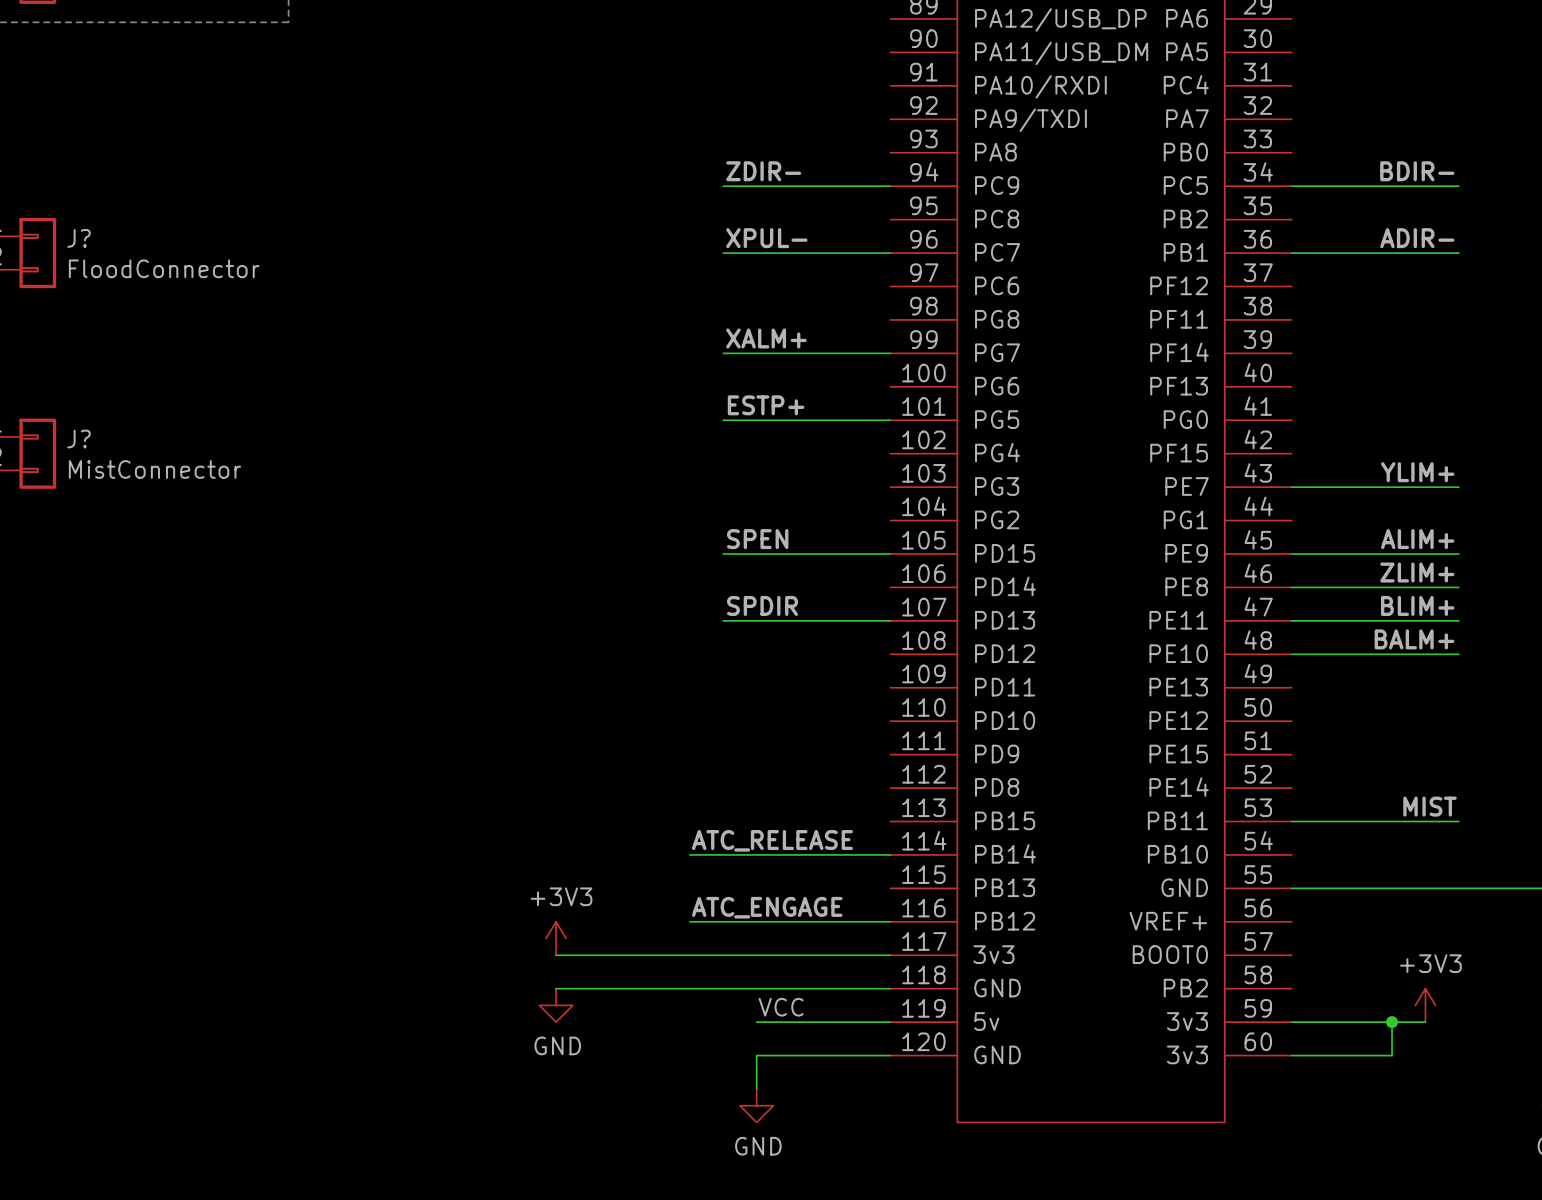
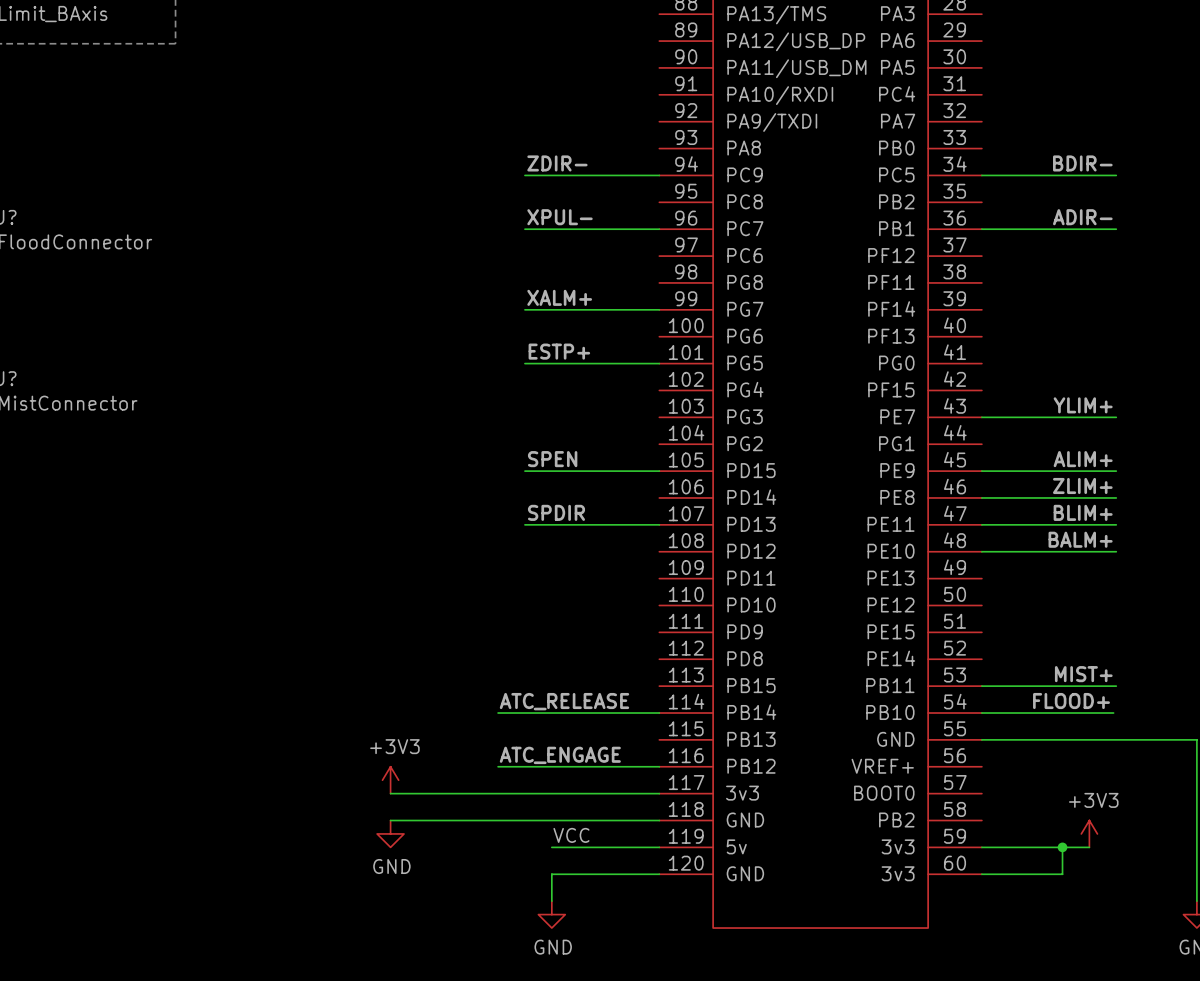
label: MIST (1430, 806) -> MIST+ (1083, 674)
label: none -> FLOOD+ (1071, 701)
wire: none -> (981, 713) (1113, 713)

